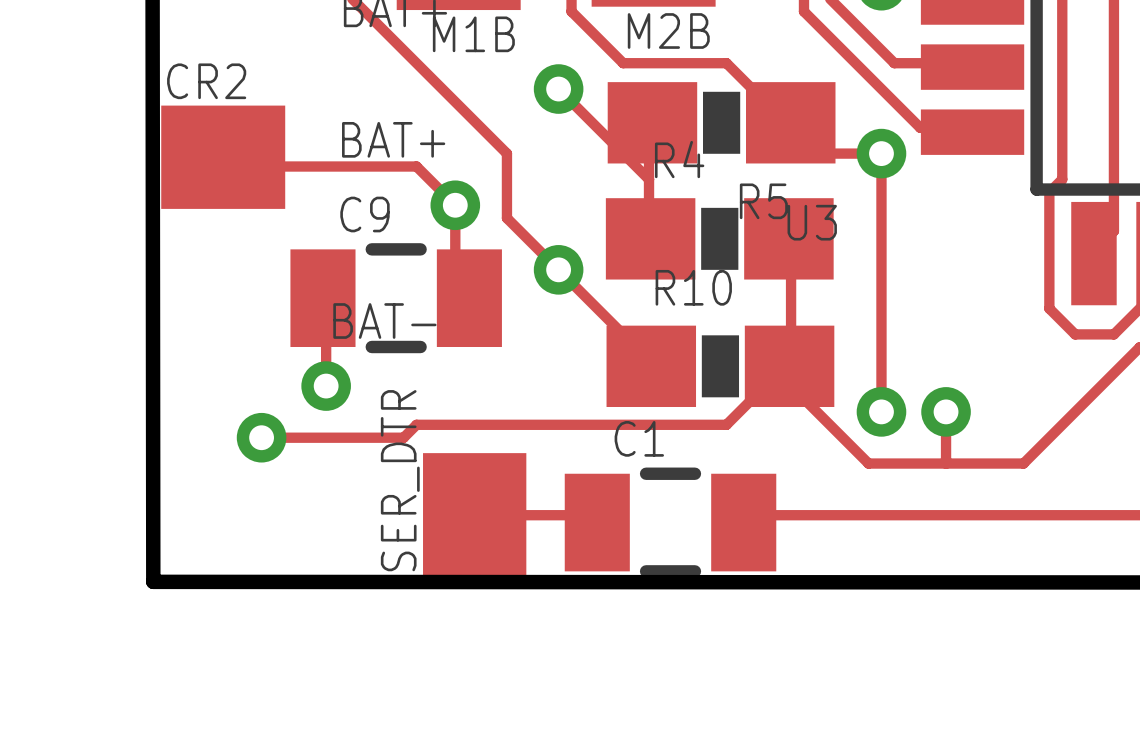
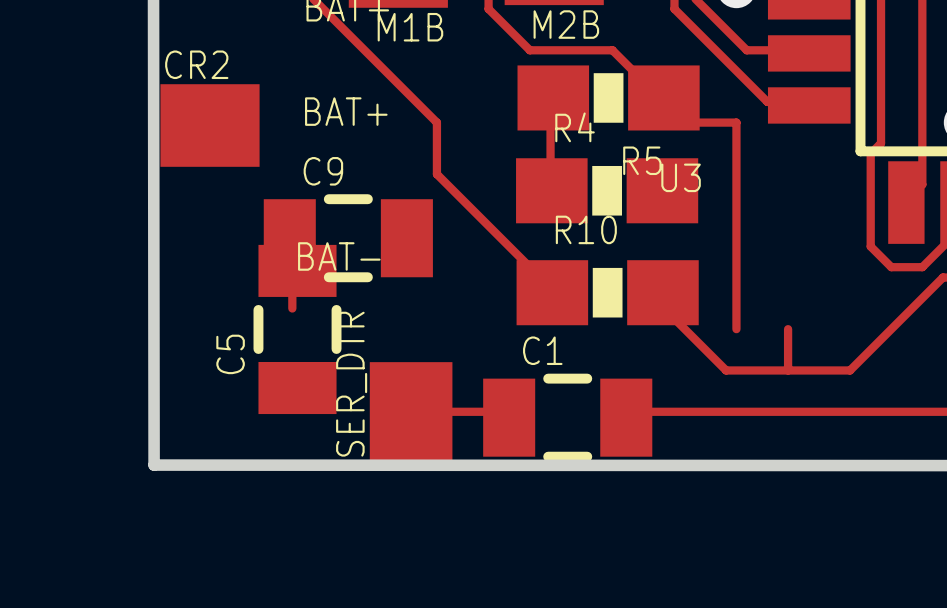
track: (558, 89) (649, 179) -> none
via: (558, 89) -> none
via: (881, 153) -> none
track: (223, 157) (235, 166) (416, 166) (455, 205) (455, 282) (469, 298) -> none
via: (455, 205) -> none
track: (788, 238) (791, 244) (789, 366) (778, 373) (726, 424) (416, 424) (403, 437) (261, 437) -> none
via: (558, 269) -> none
via: (326, 386) -> none
via: (881, 411) -> none
via: (946, 411) -> none
C5: none -> (297, 329)
via: (261, 437) -> none

